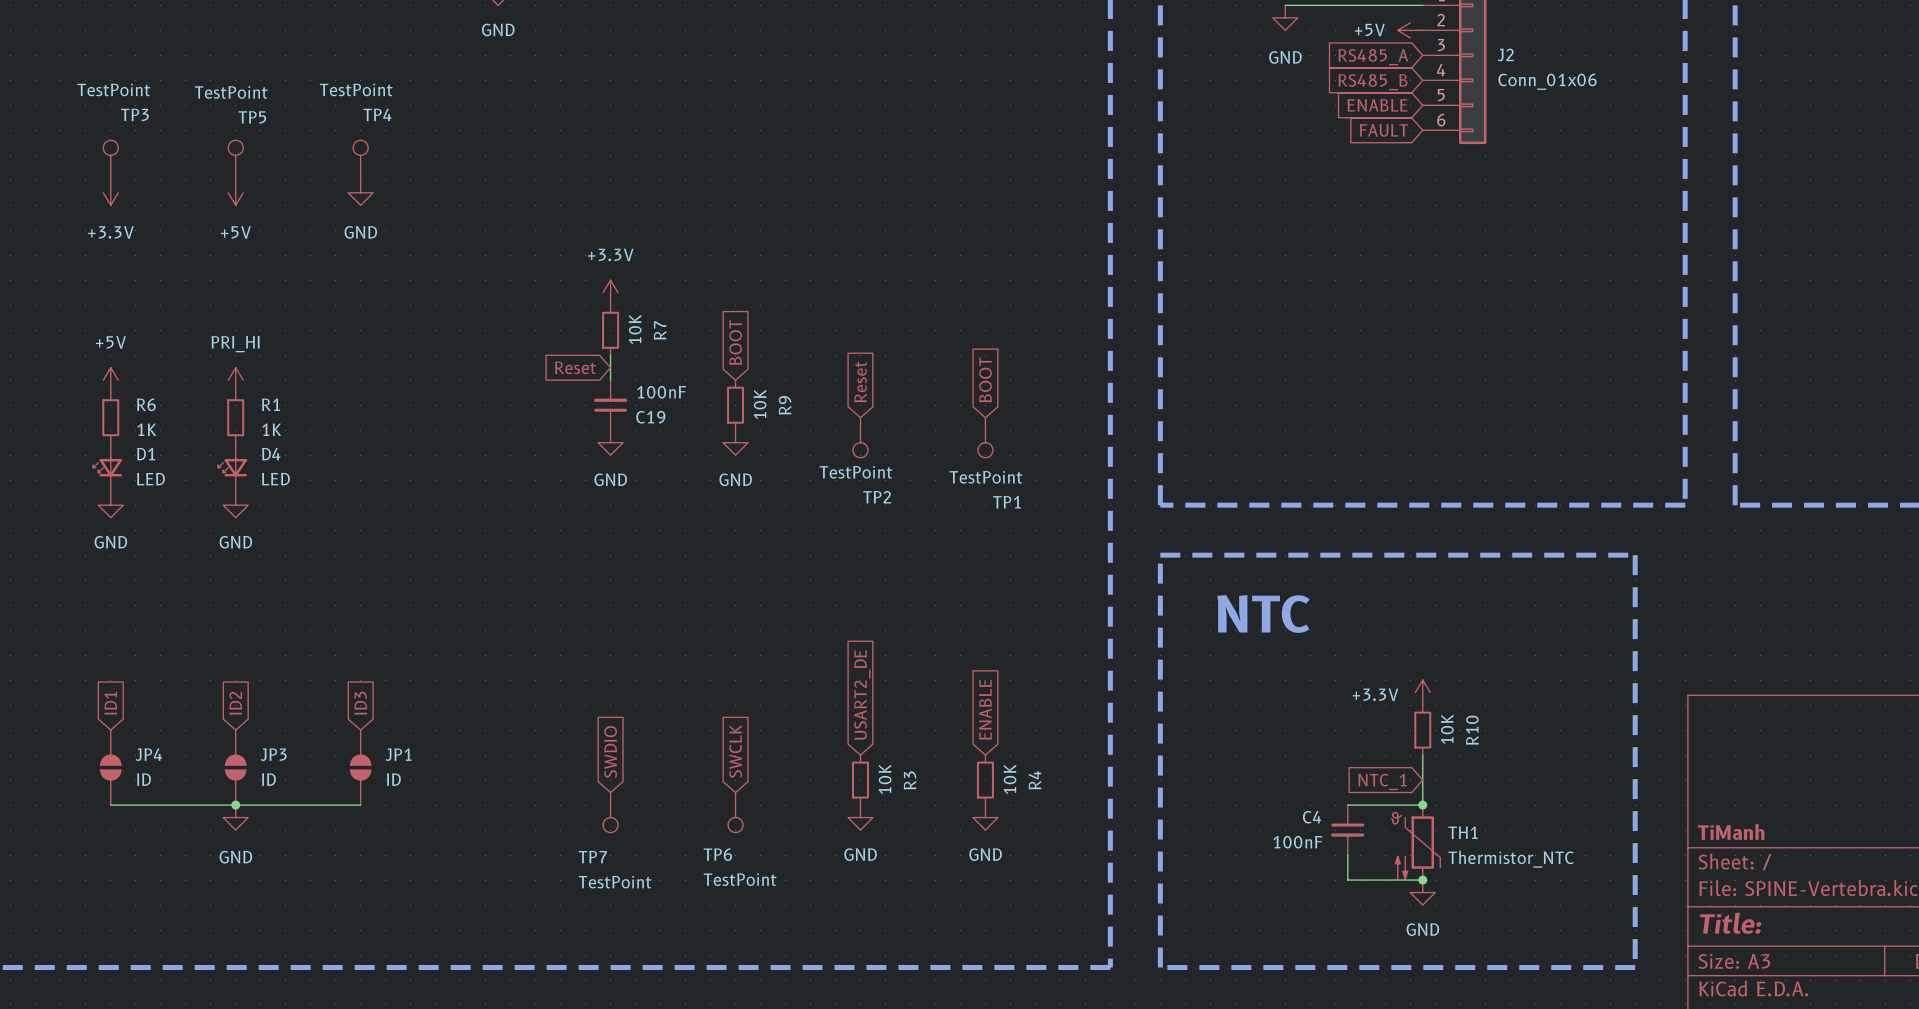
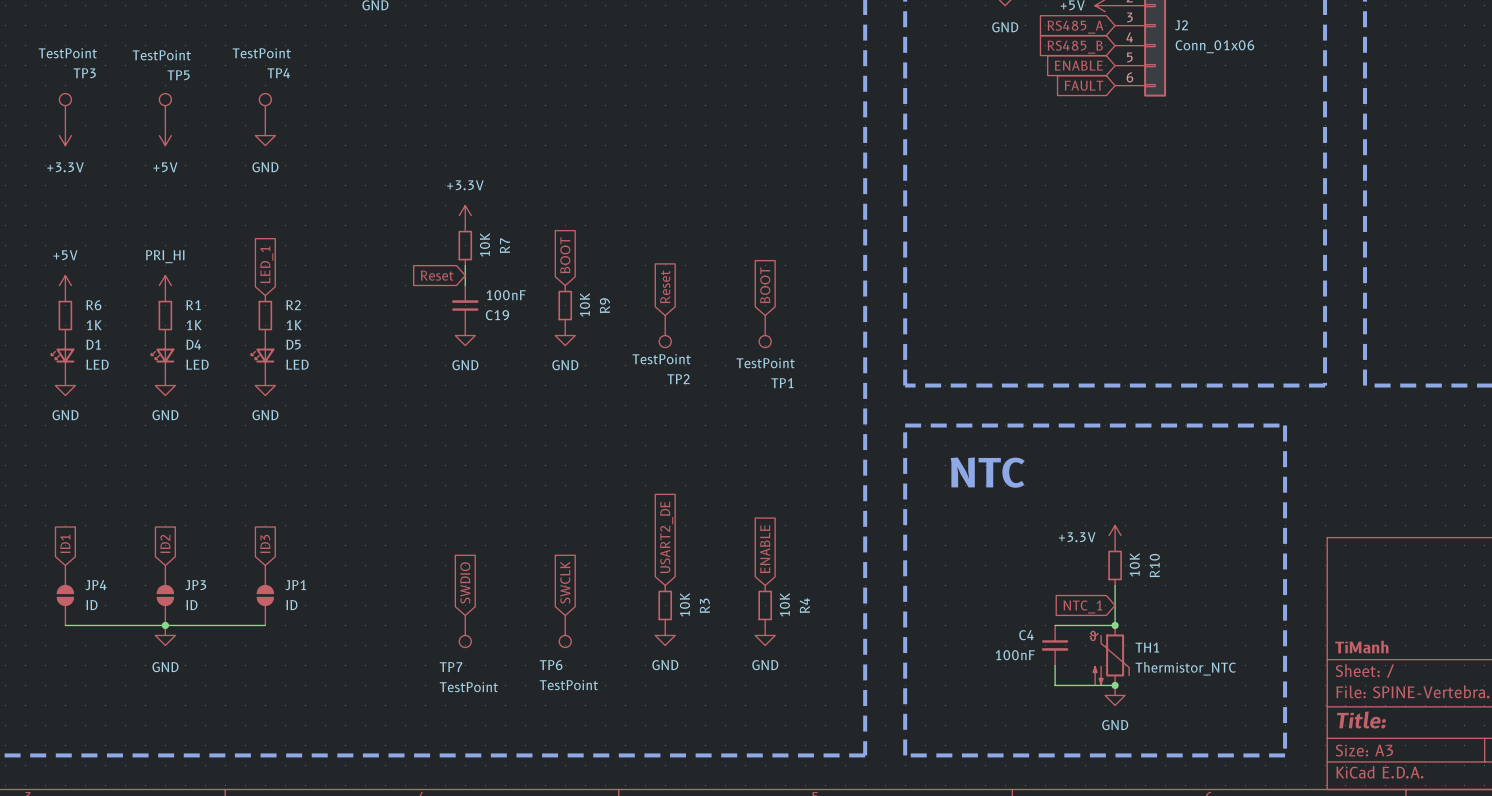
global label: none -> LED_1 (266, 264)
R2: none -> 1K (265, 315)
D5: none -> LED (262, 355)
power symbol: none -> GND (265, 385)

